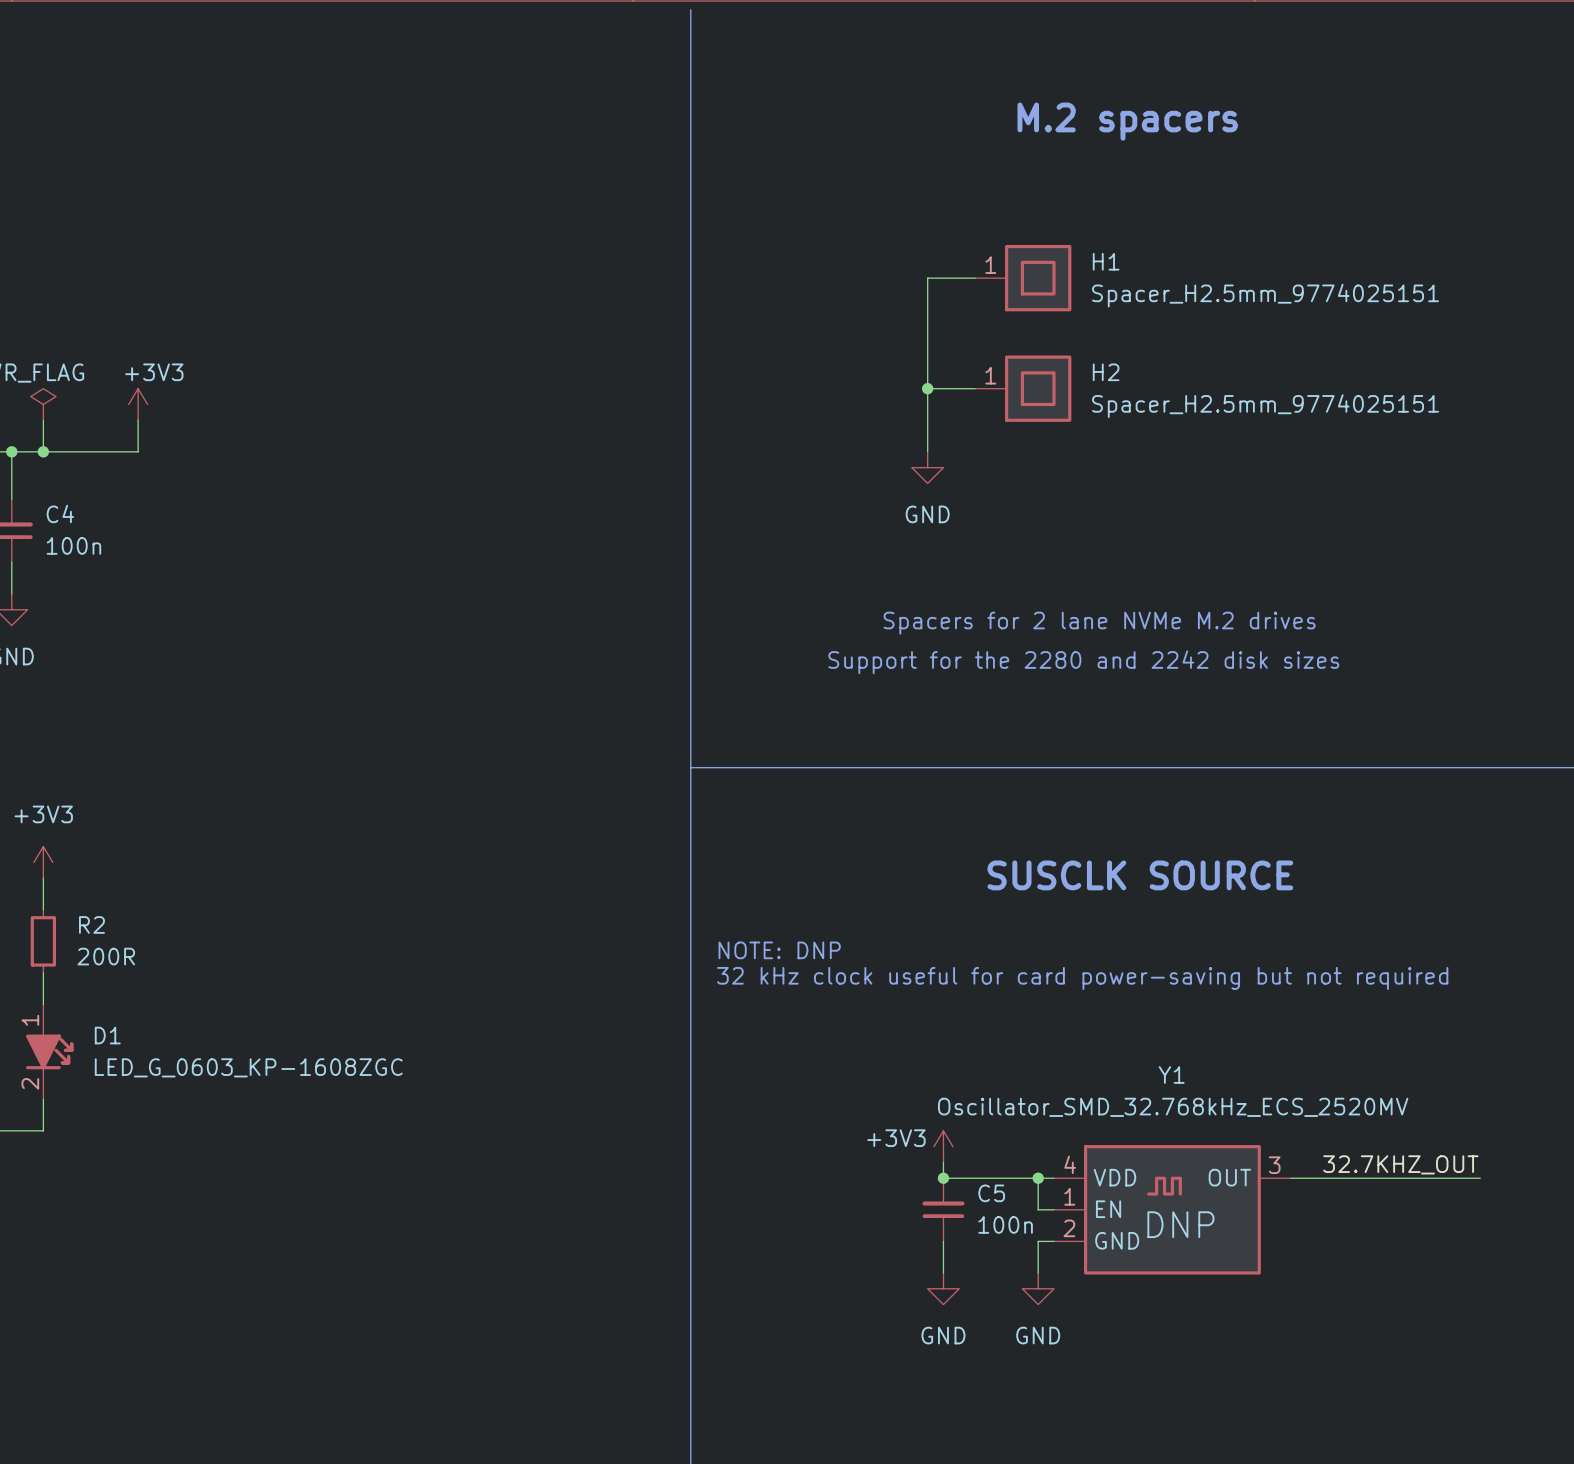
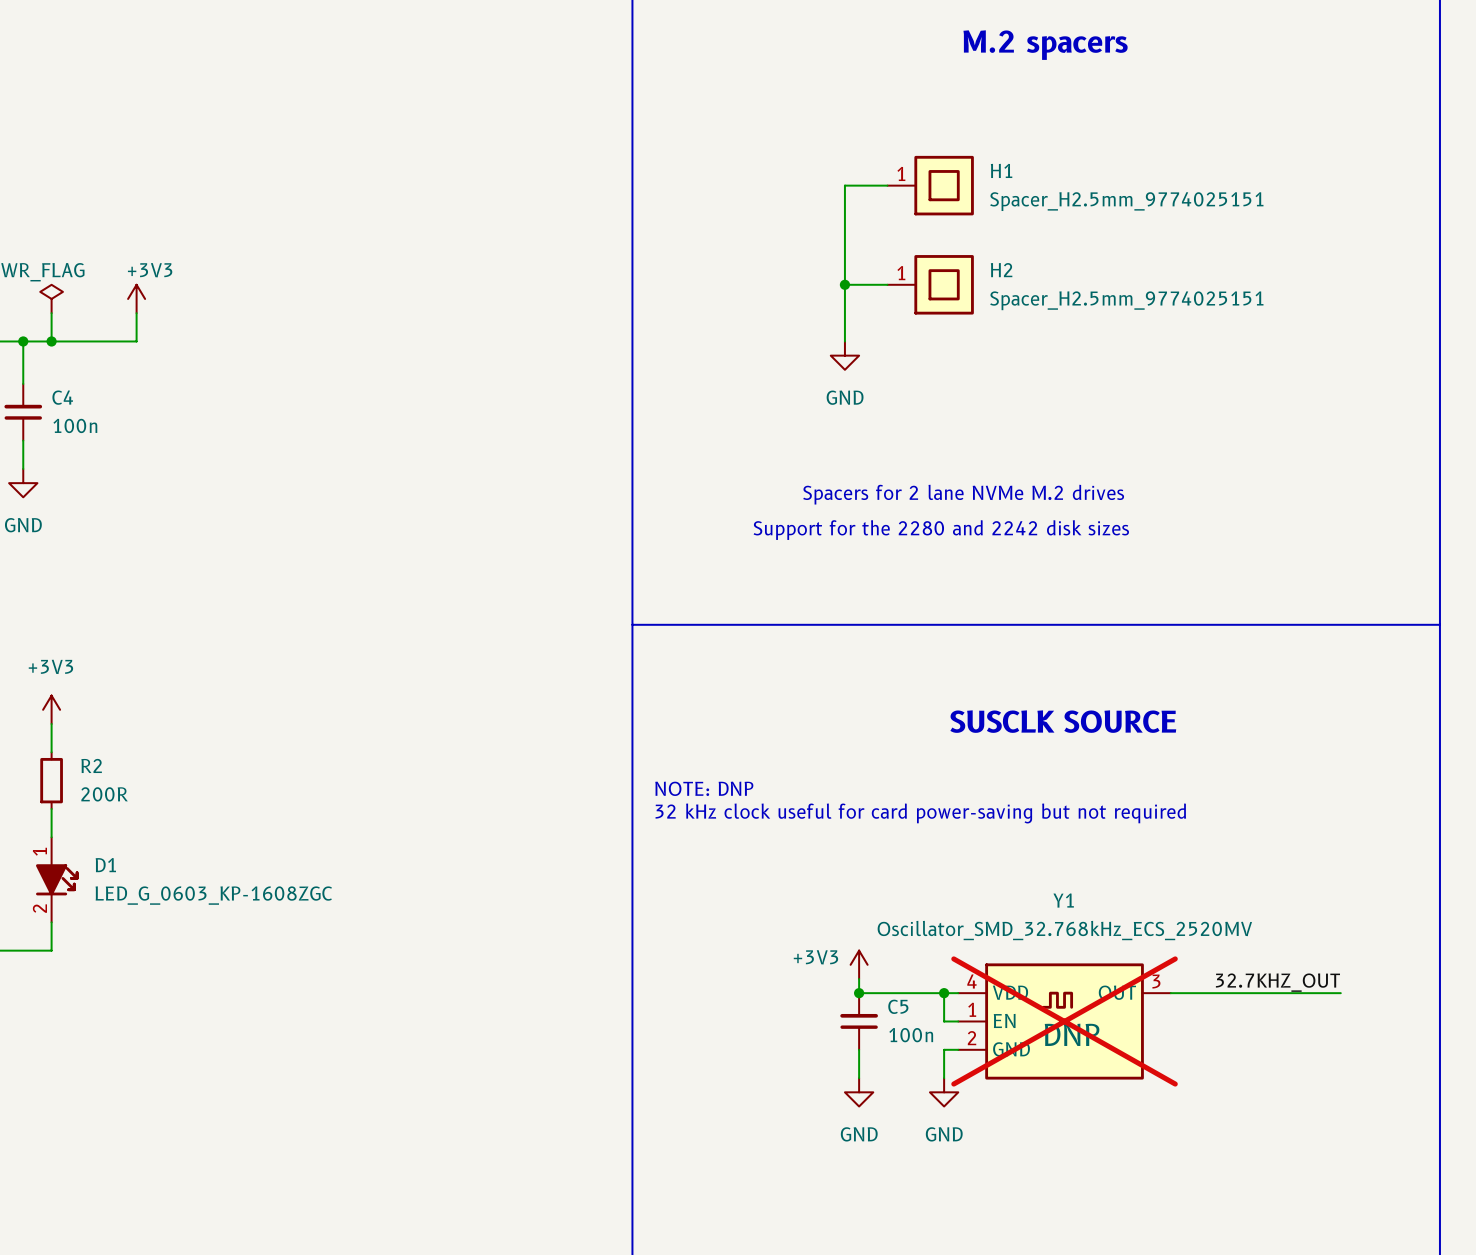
Y1 do-not-place cross: none -> (1064, 1021)

